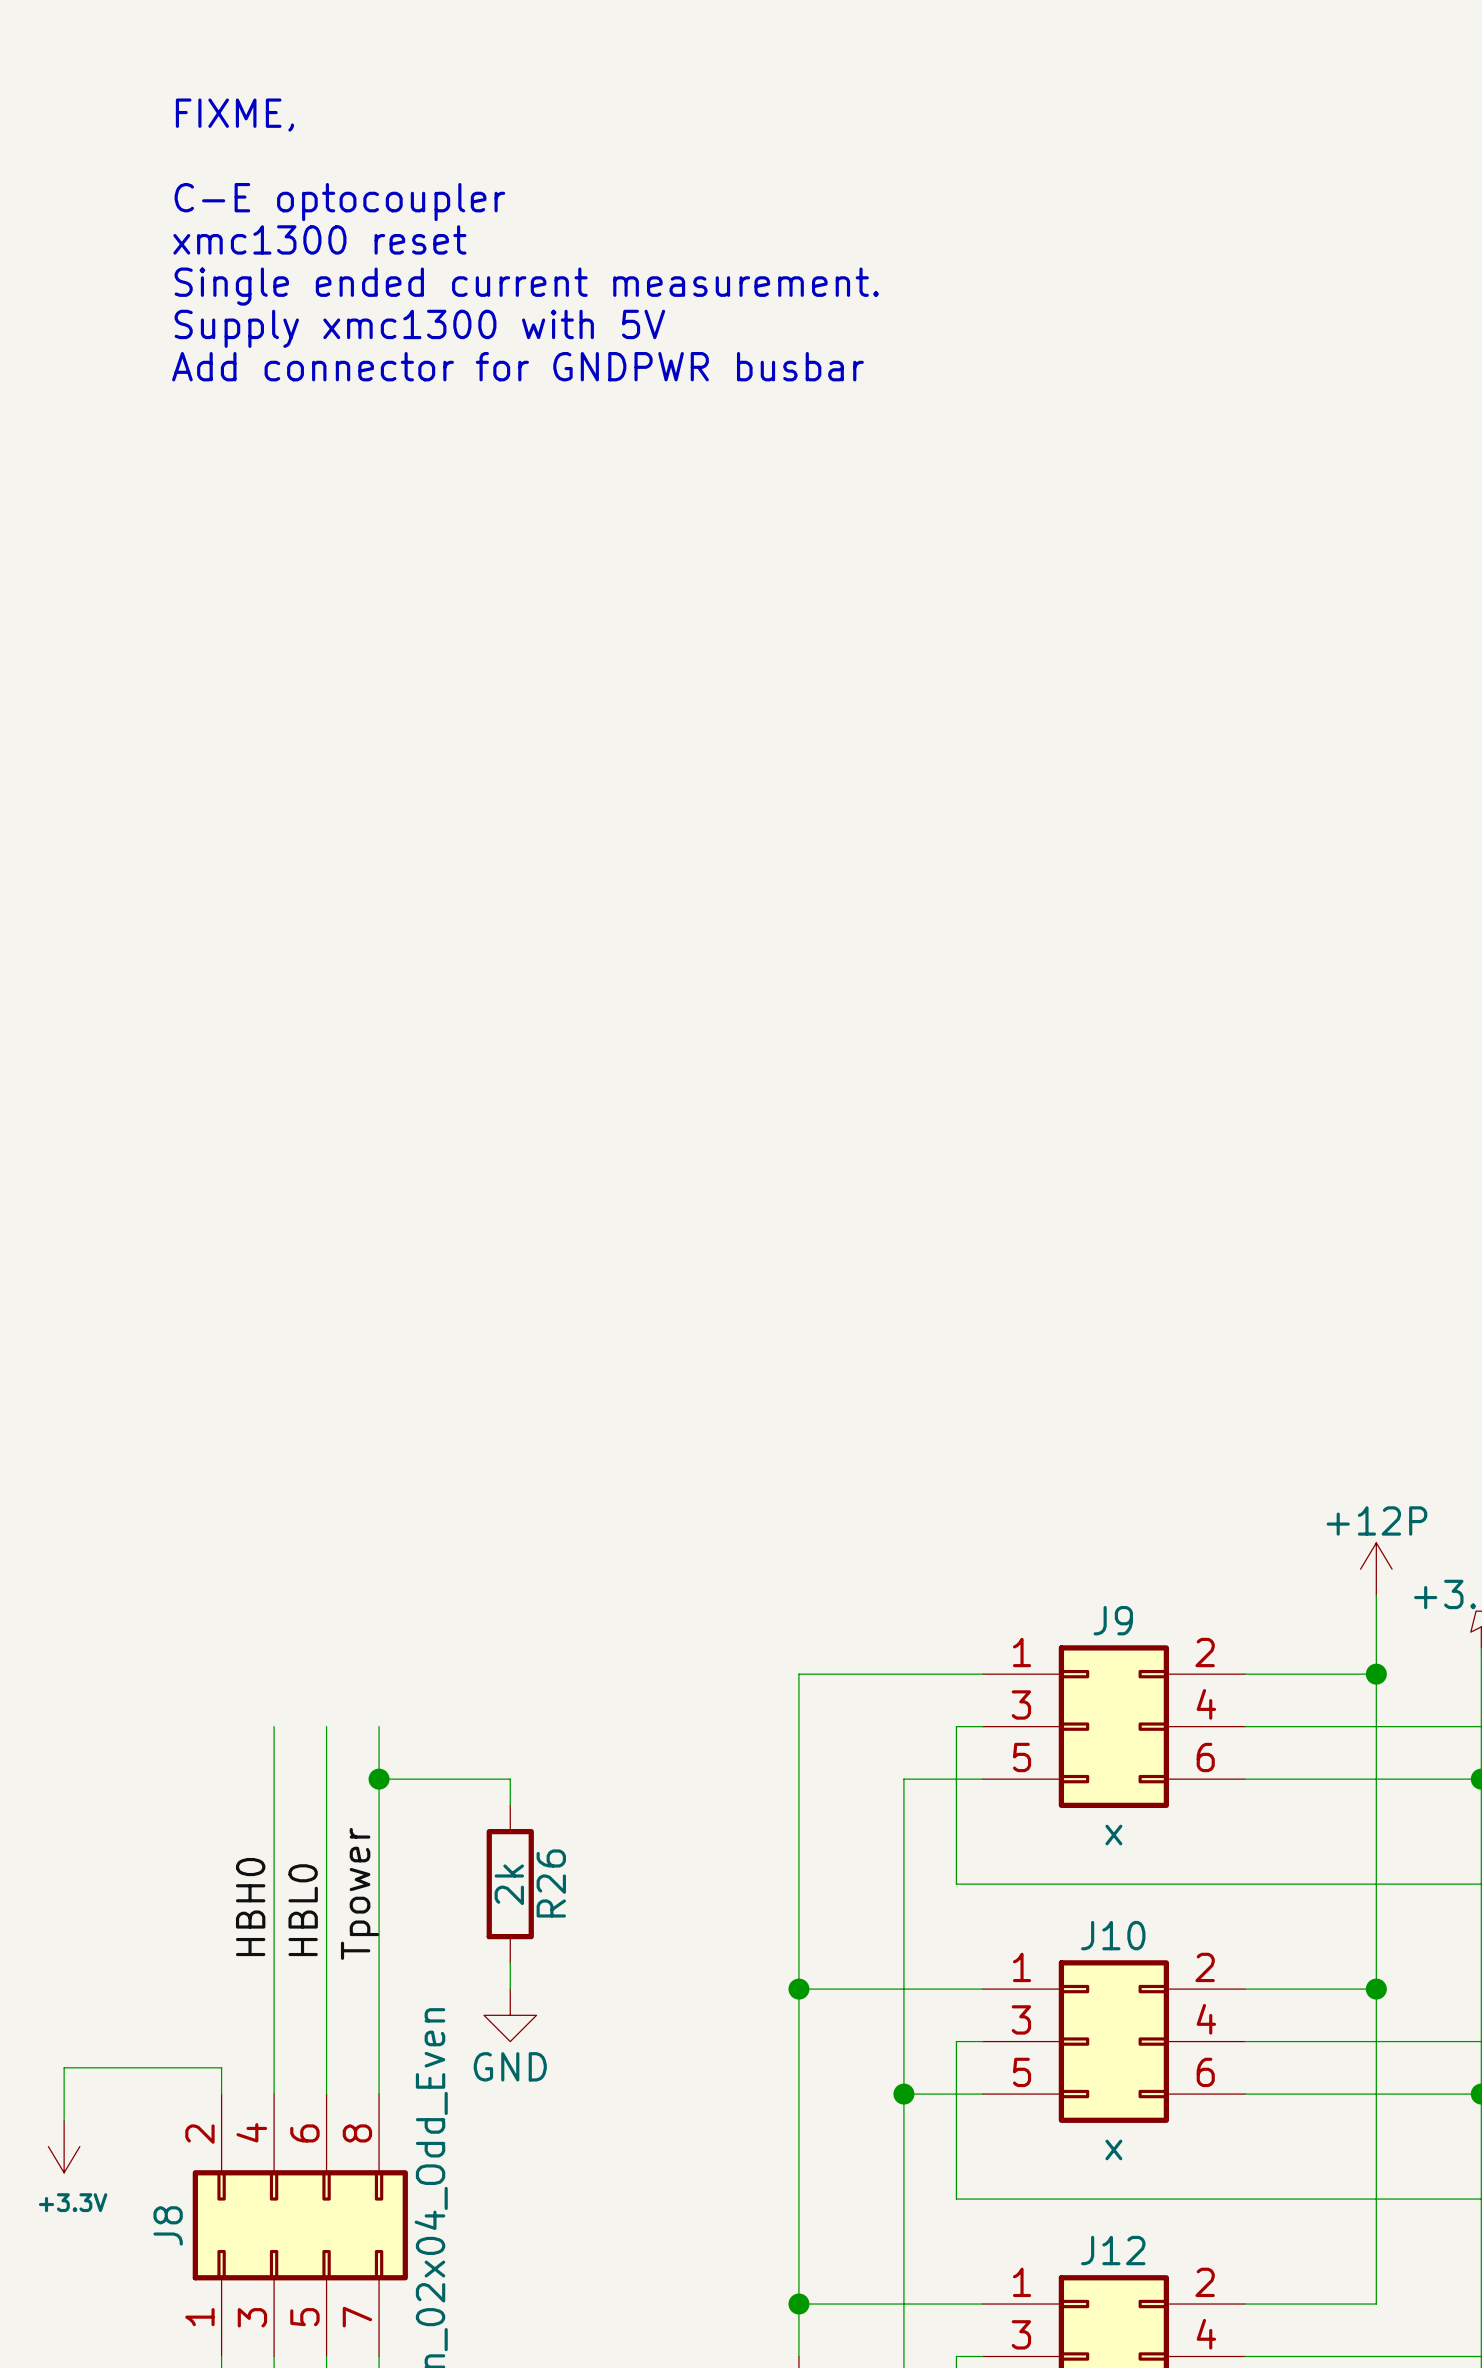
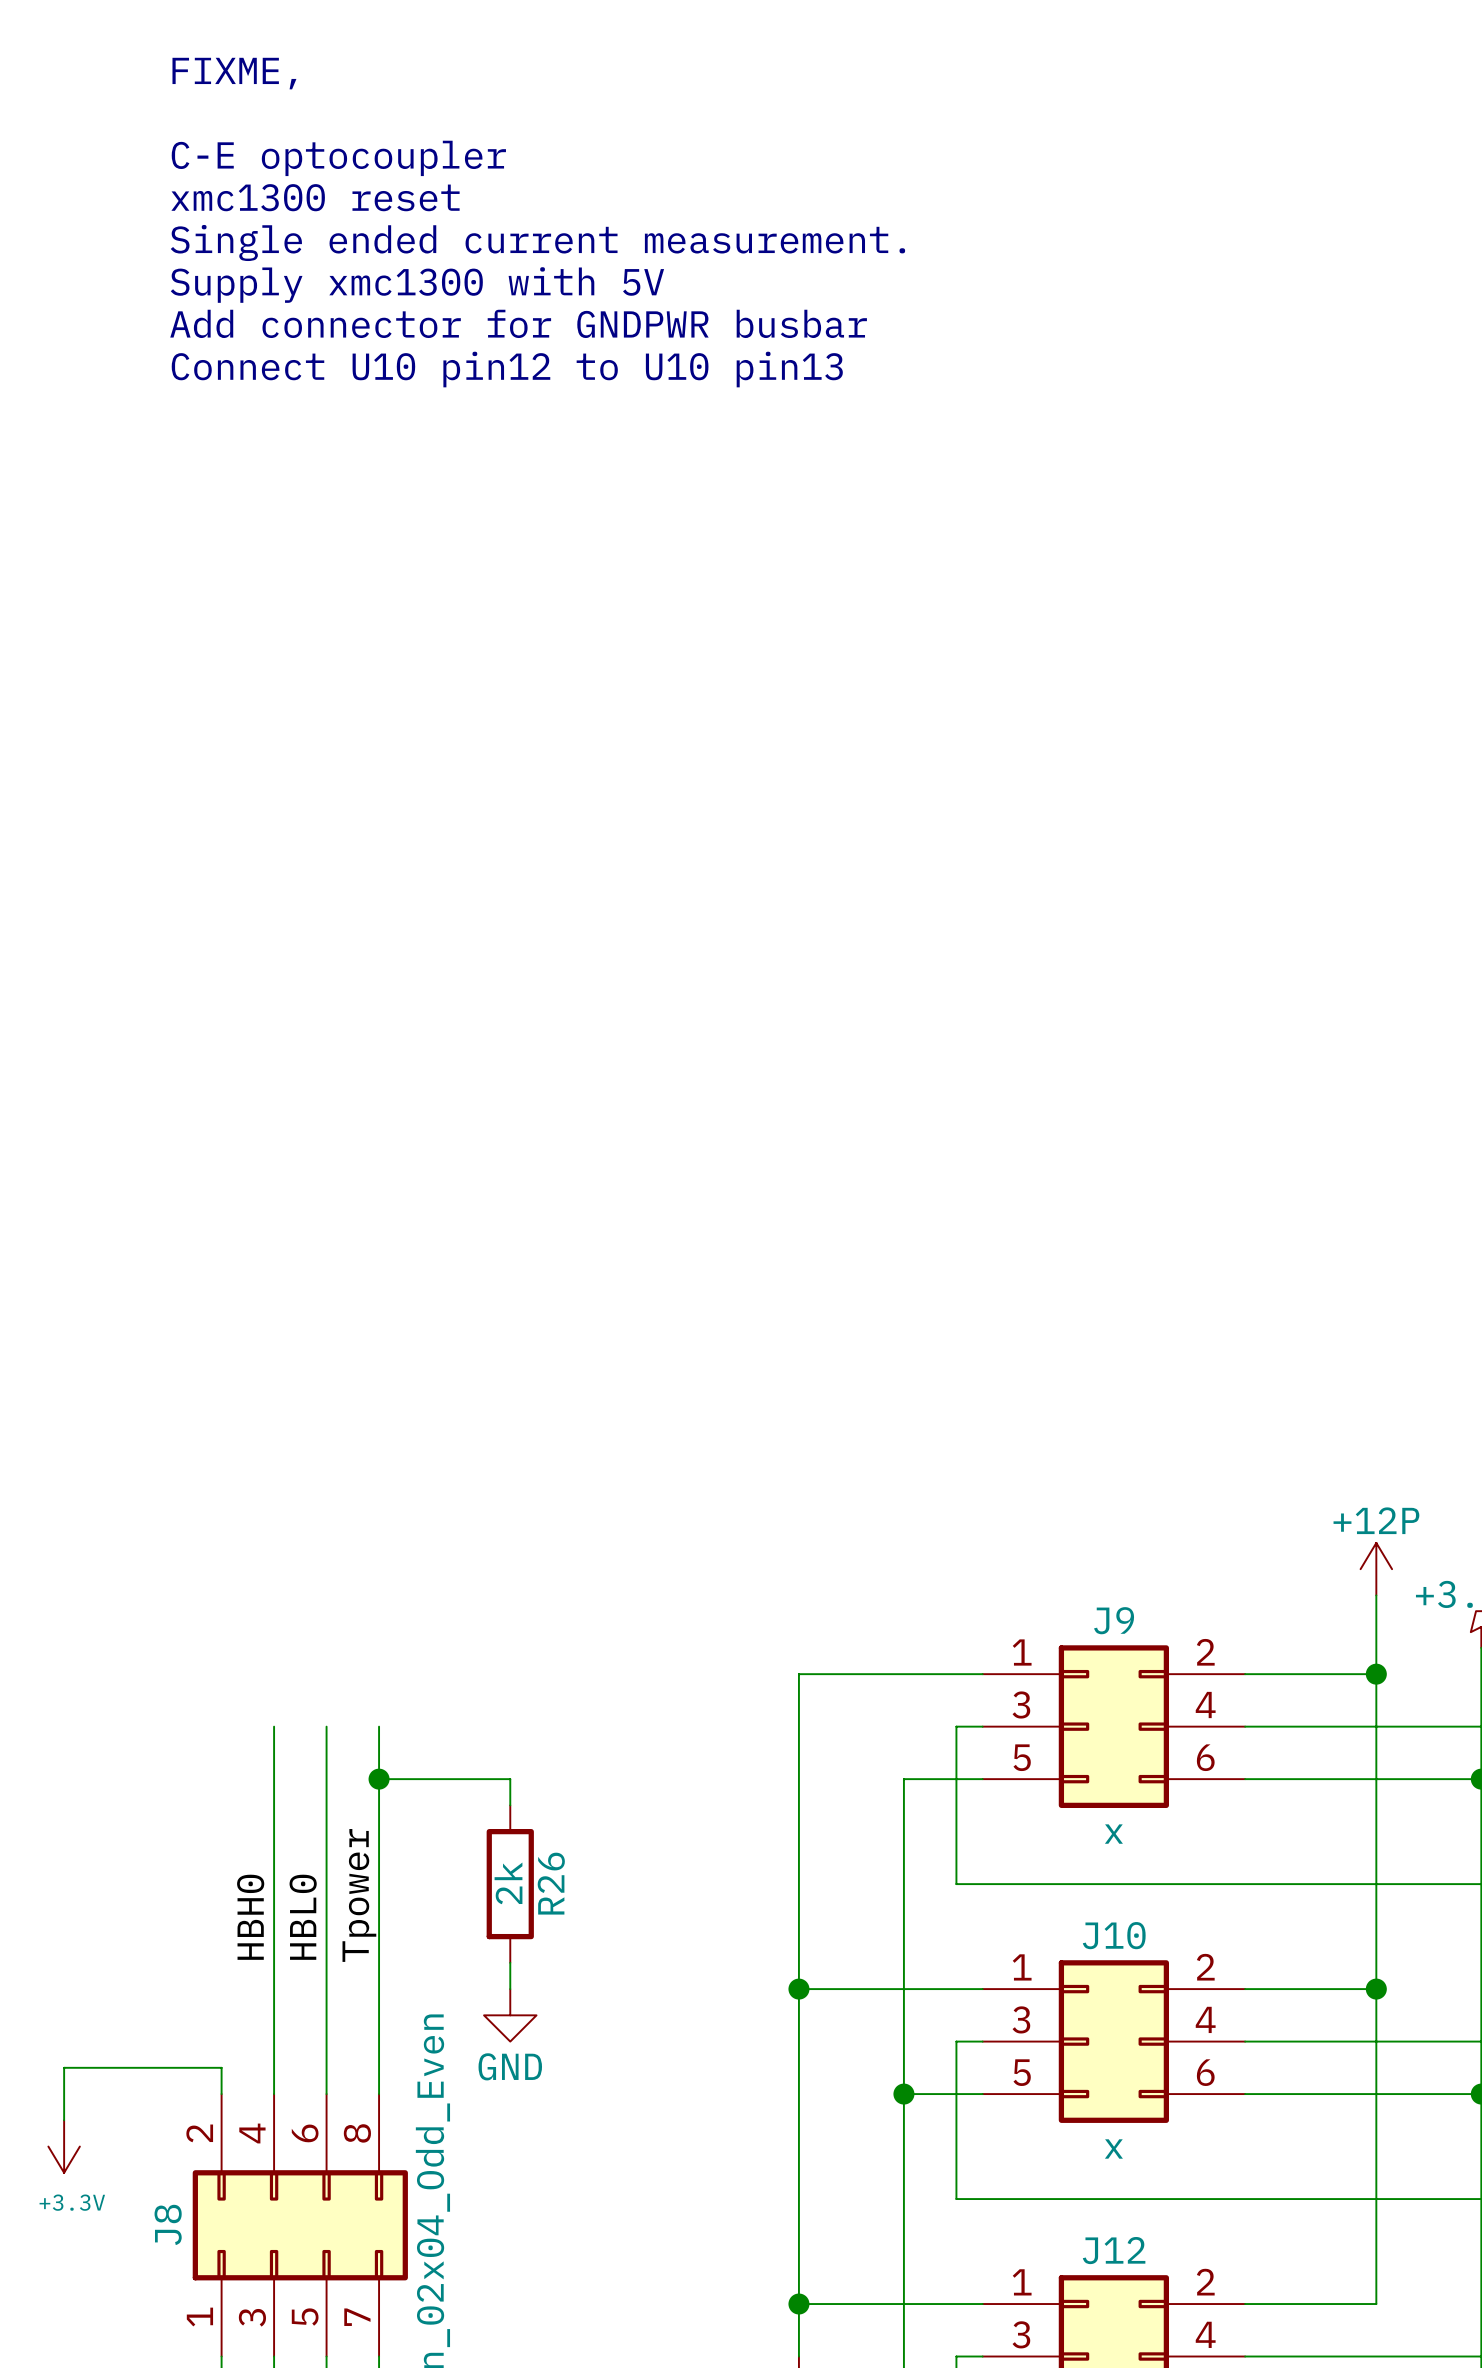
text position: FIXME, (234, 115) -> FIXME, (234, 73)
text: none -> C-E optocoupler (338, 158)
text: C-E optocoupler (339, 202) -> xmc1300 reset (315, 197)
text: xmc1300 reset (319, 239) -> Single ended current measurement. (537, 242)
text: Single ended current measurement. (526, 286) -> Supply xmc1300 with 5V (417, 285)
text: Supply xmc1300 with 5V (419, 328) -> Add connector for GNDPWR busbar (518, 323)
text: Add connector for GNDPWR busbar (517, 366) -> Connect U10 pin12 to U10 pin13 (507, 369)

